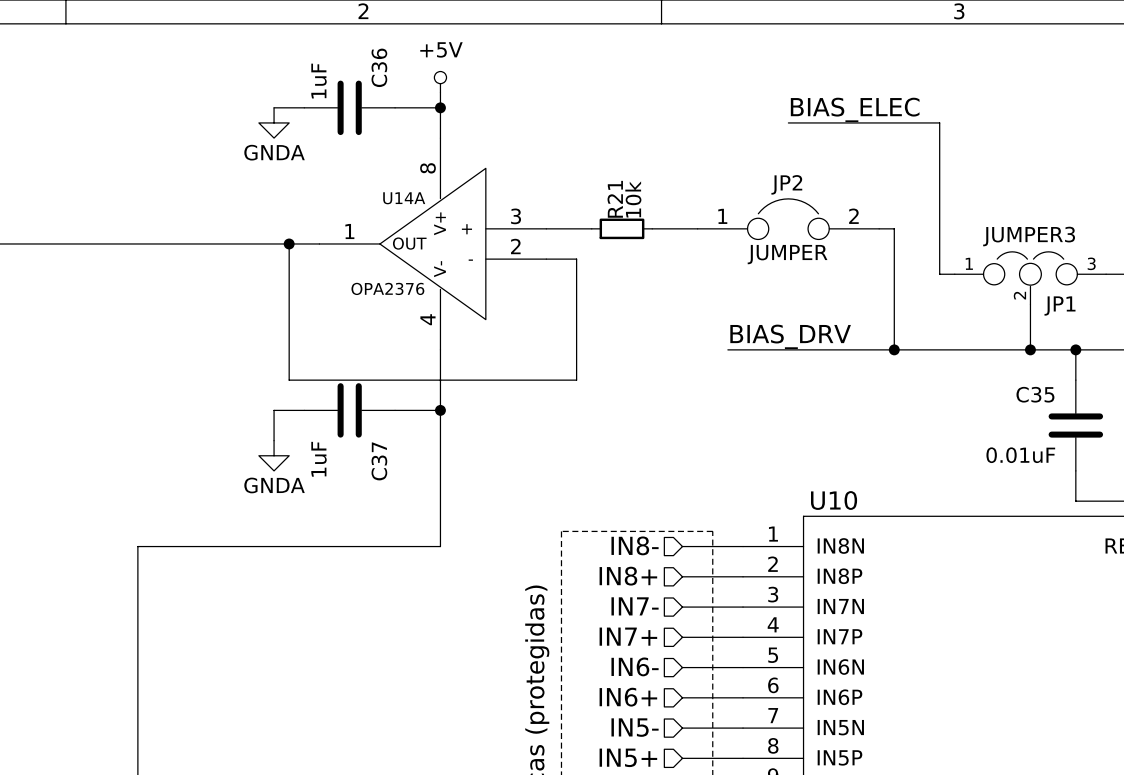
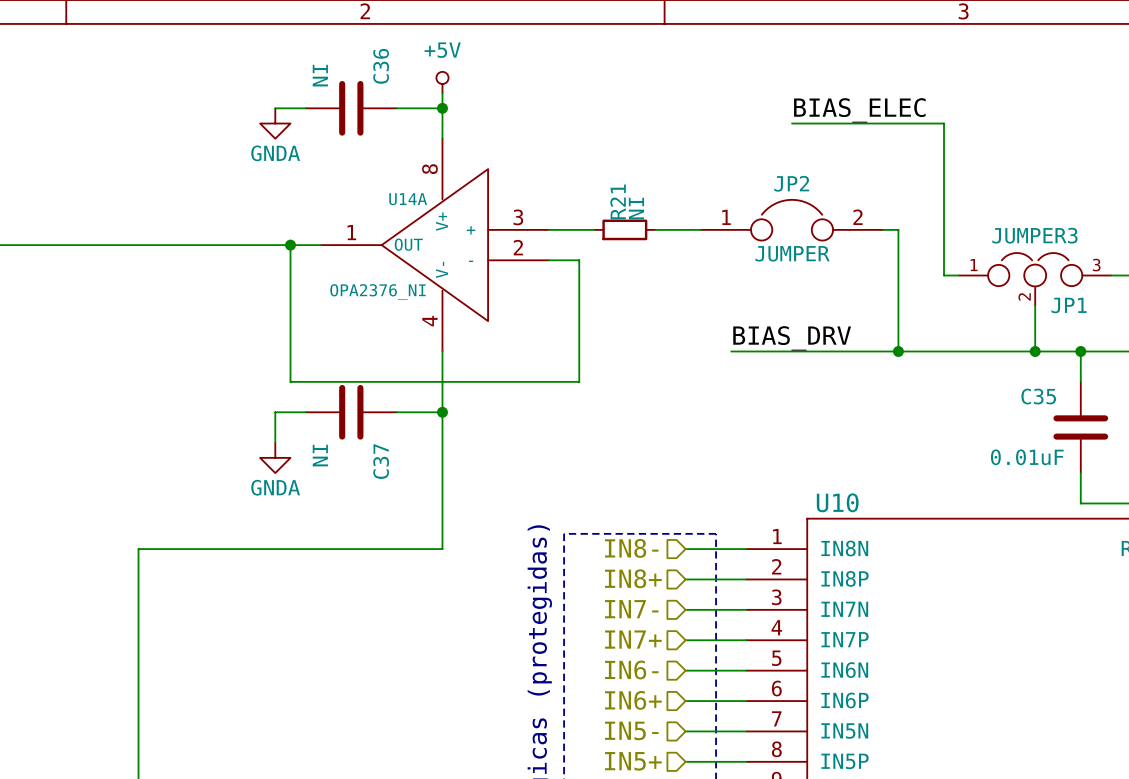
C36 value: 1uF (319, 81) -> NI (320, 75)
R21 value: 10k (633, 199) -> NI (636, 208)
U14A value: OPA2376 (387, 288) -> OPA2376_NI (378, 292)
C37 value: 1uF (319, 459) -> NI (320, 455)

